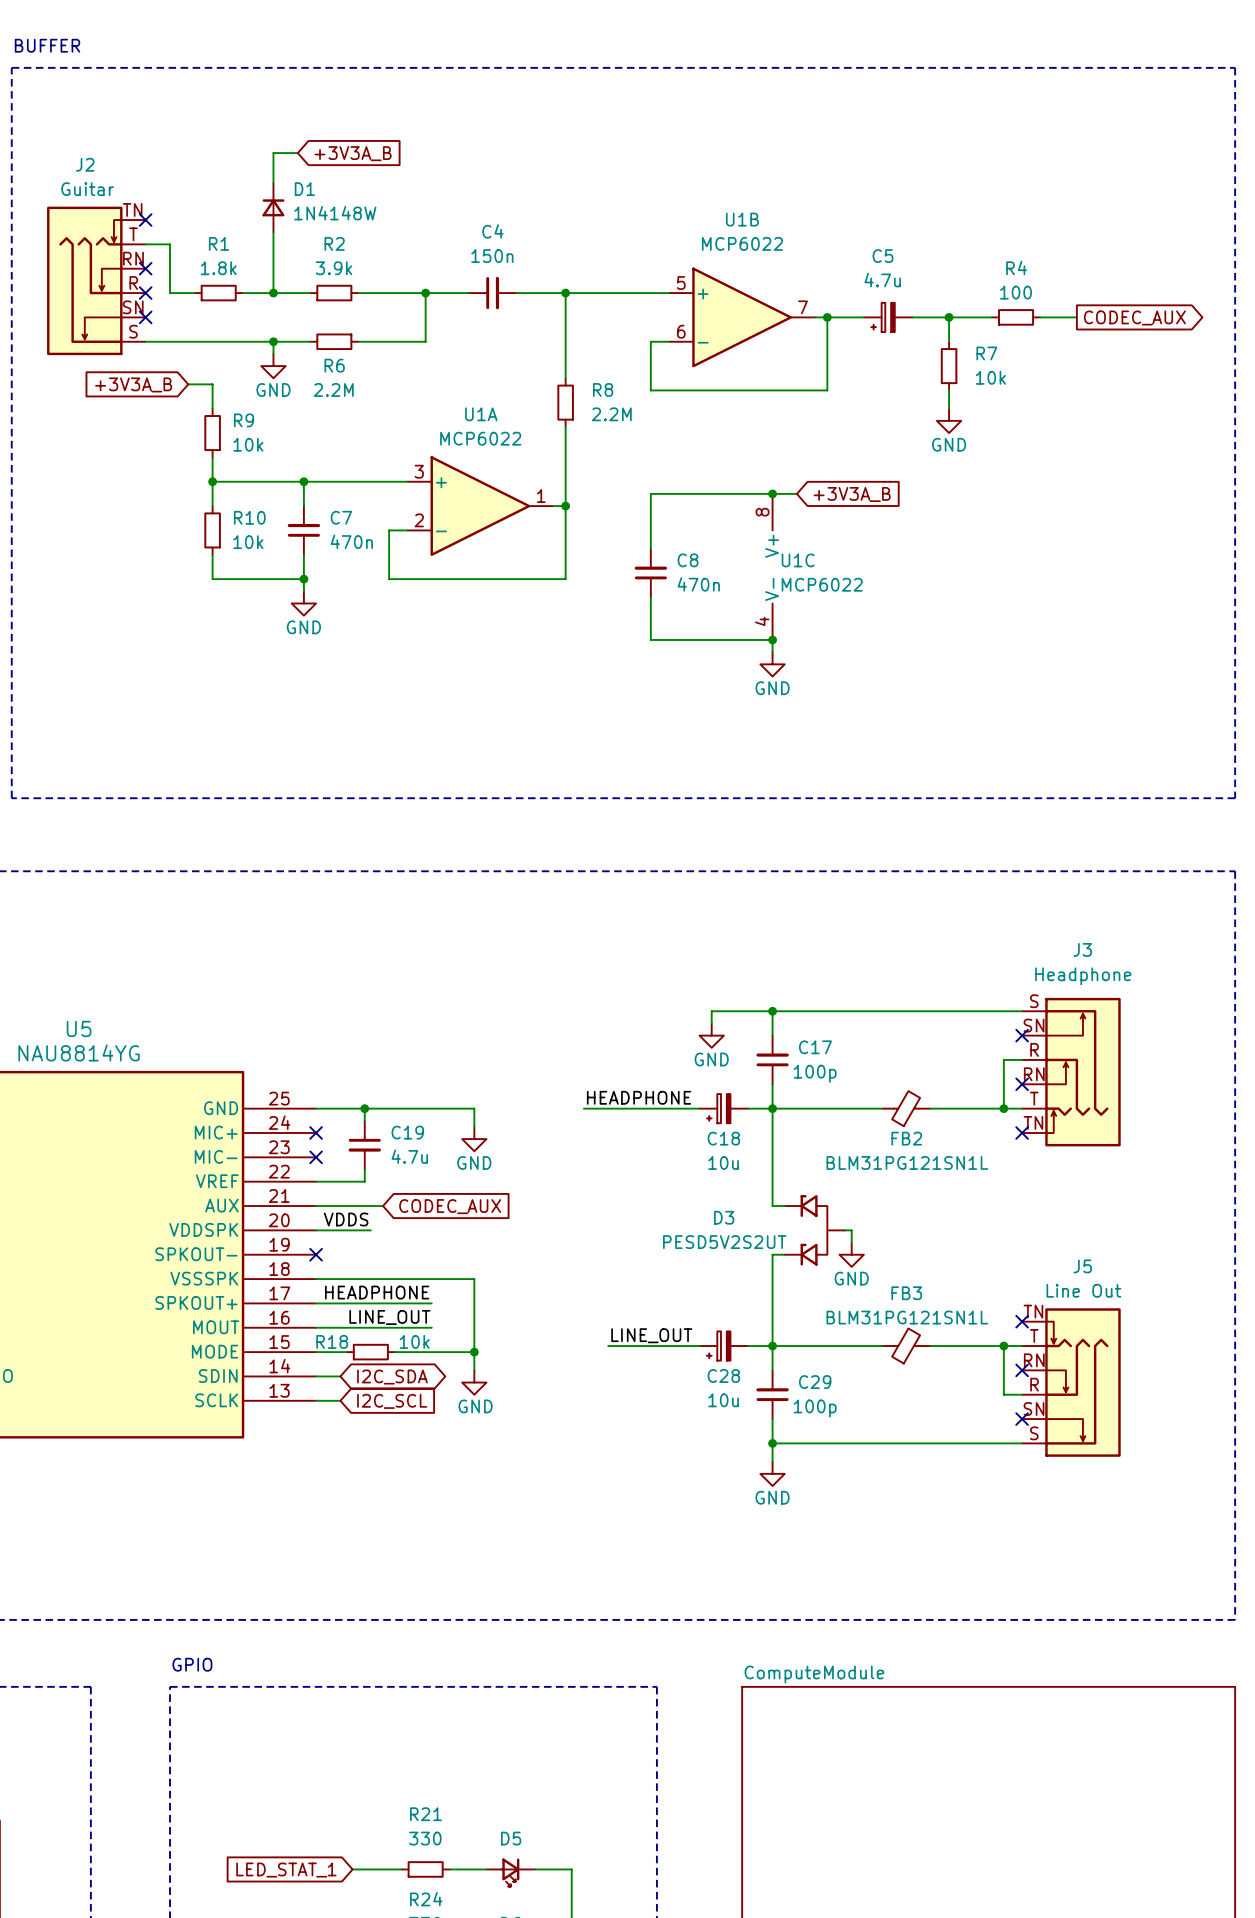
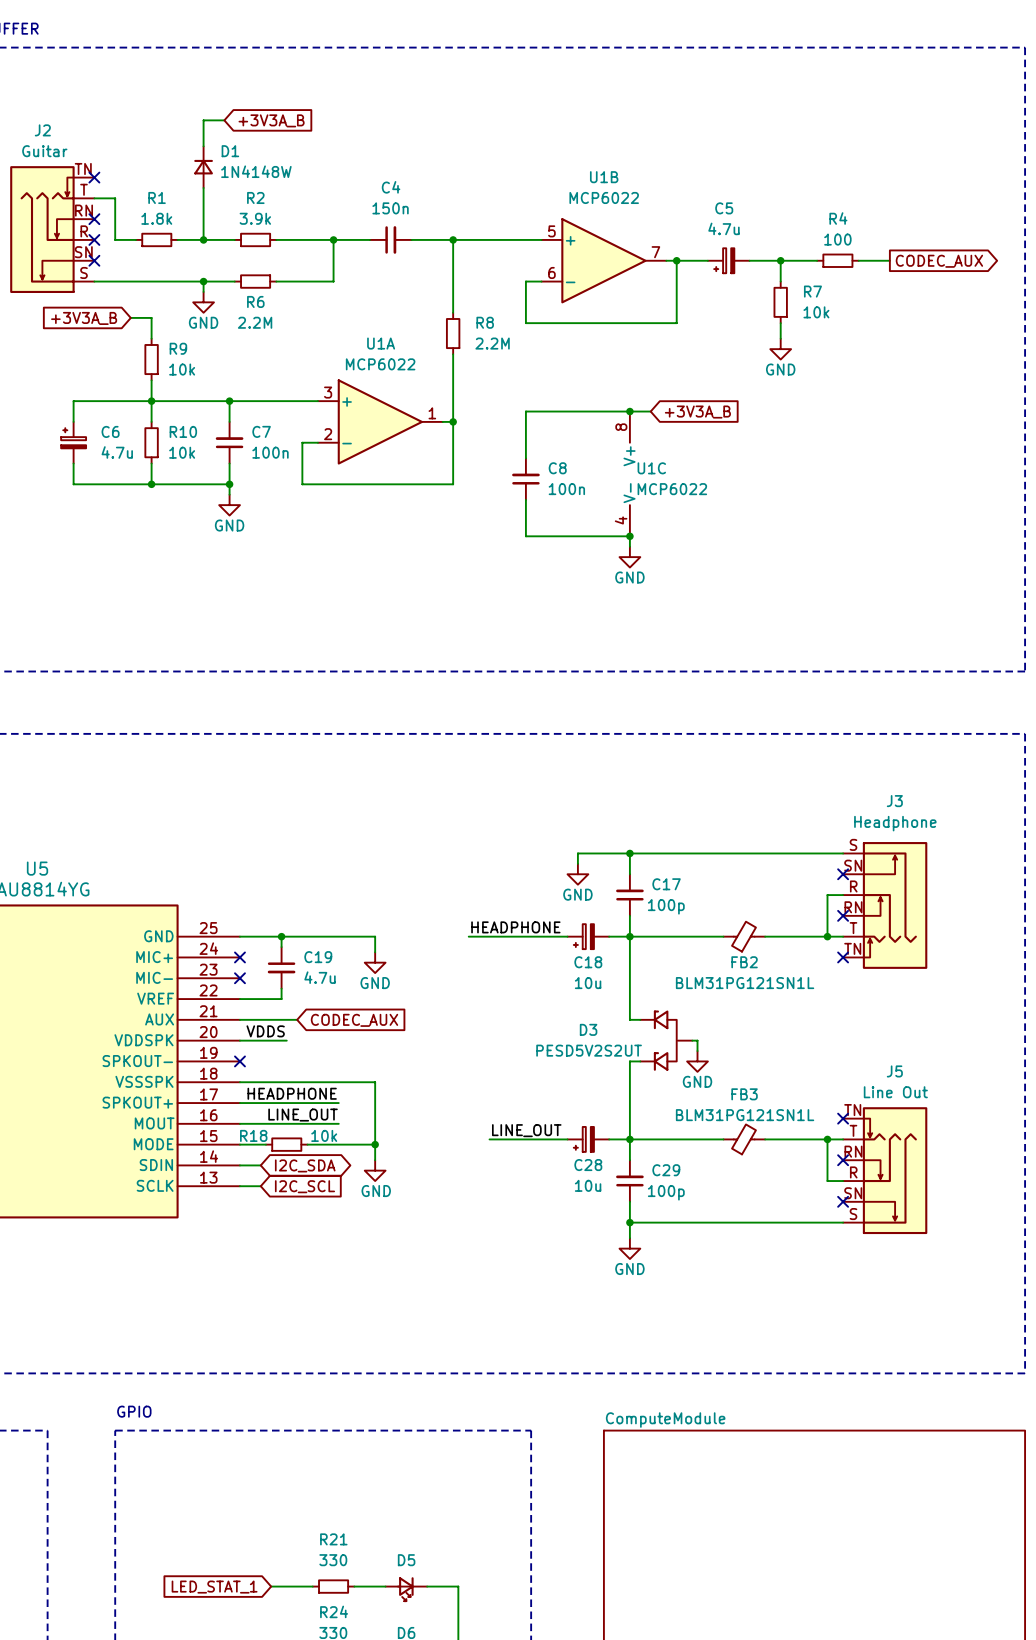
wire: none -> (151, 401) (73, 401) (73, 421)
C6: none -> 4.7u (73, 442)
C7 value: 470n (351, 541) -> 100n (270, 452)
wire: none -> (73, 463) (73, 484) (151, 484)
junction: none -> (151, 484)
C8 value: 470n (698, 584) -> 100n (566, 489)

